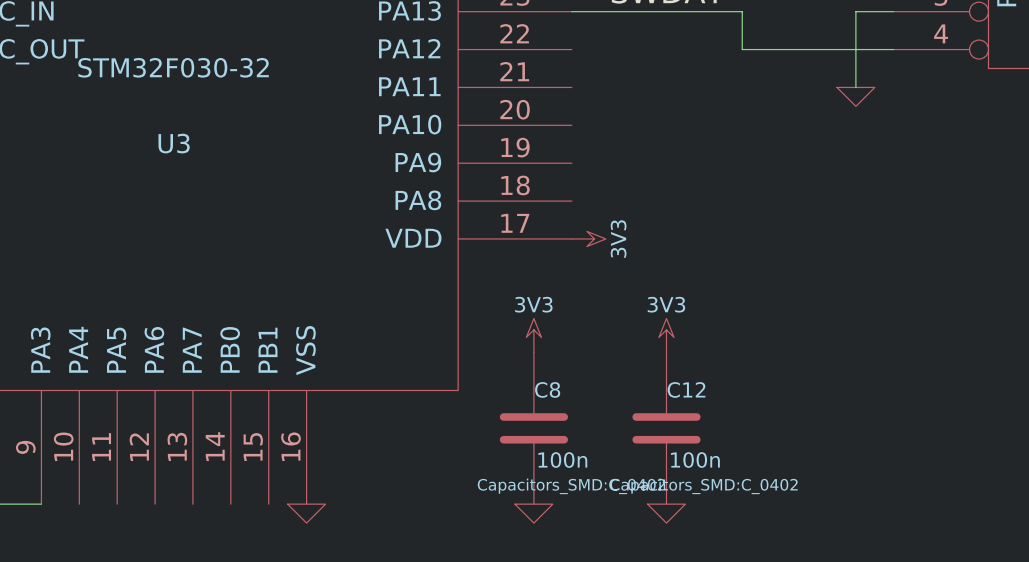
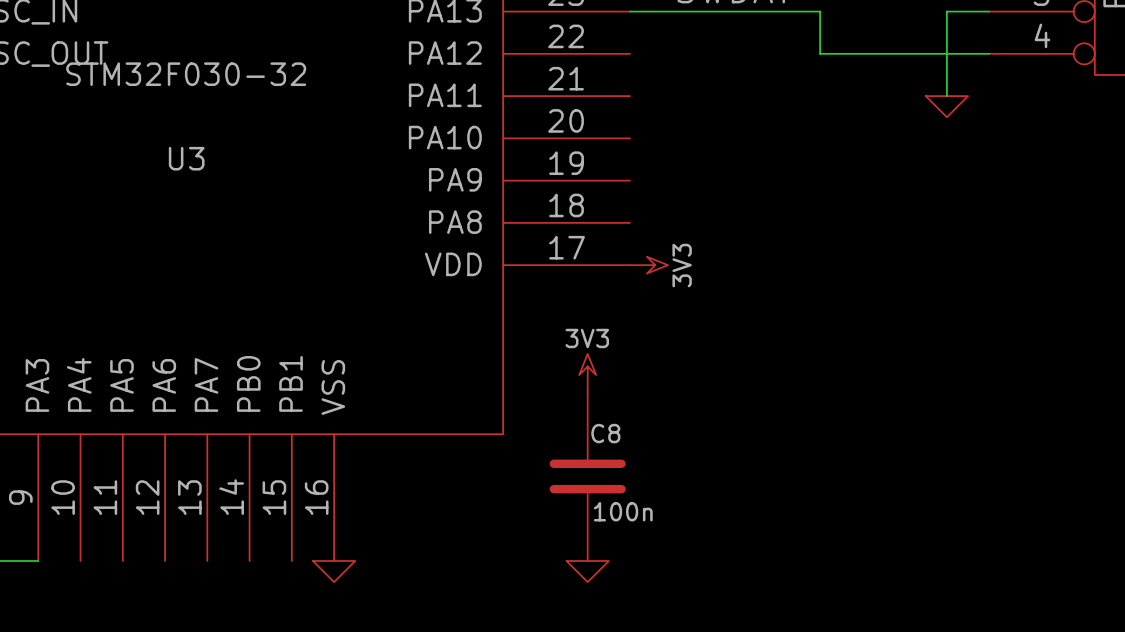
power symbol: 3V3 (666, 335) -> none
C12: 100n (666, 428) -> none
C8 text: Capacitors_SMD:C_0402 (571, 486) -> none
power symbol: (666, 513) -> none

